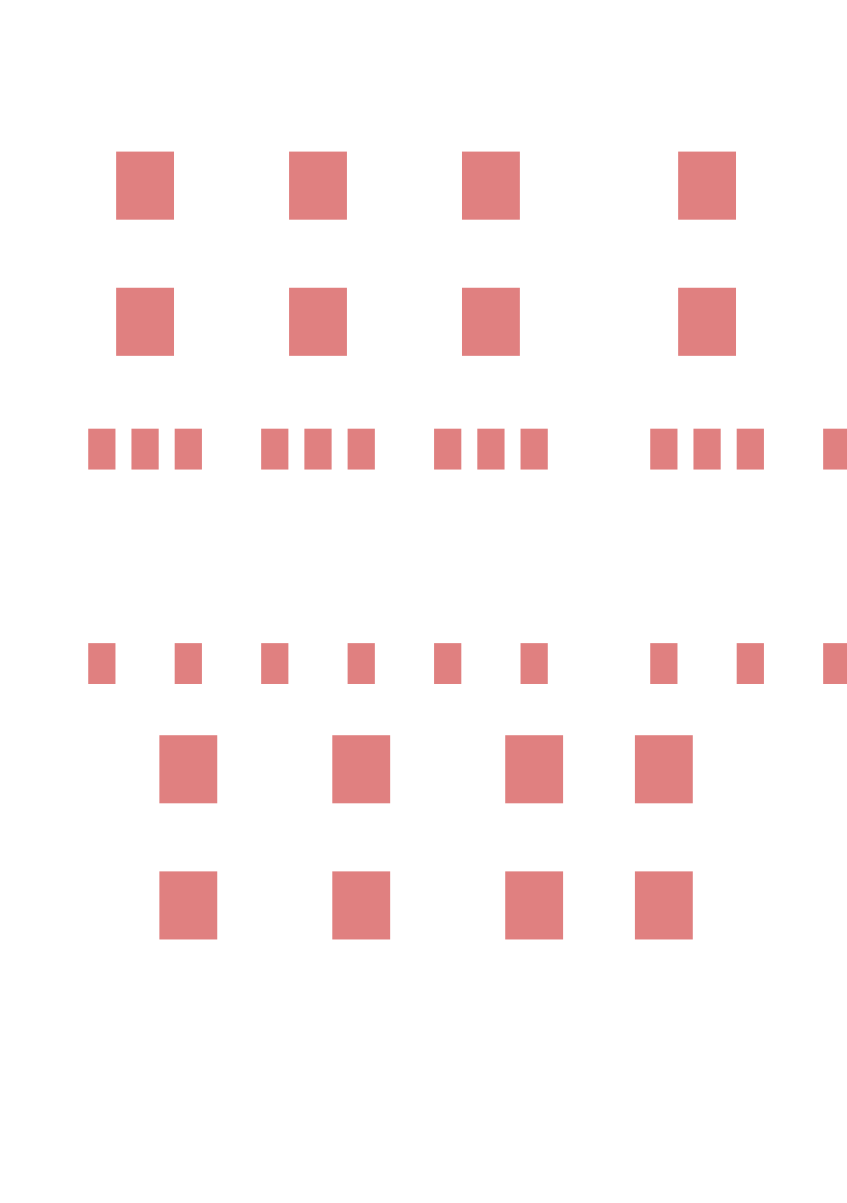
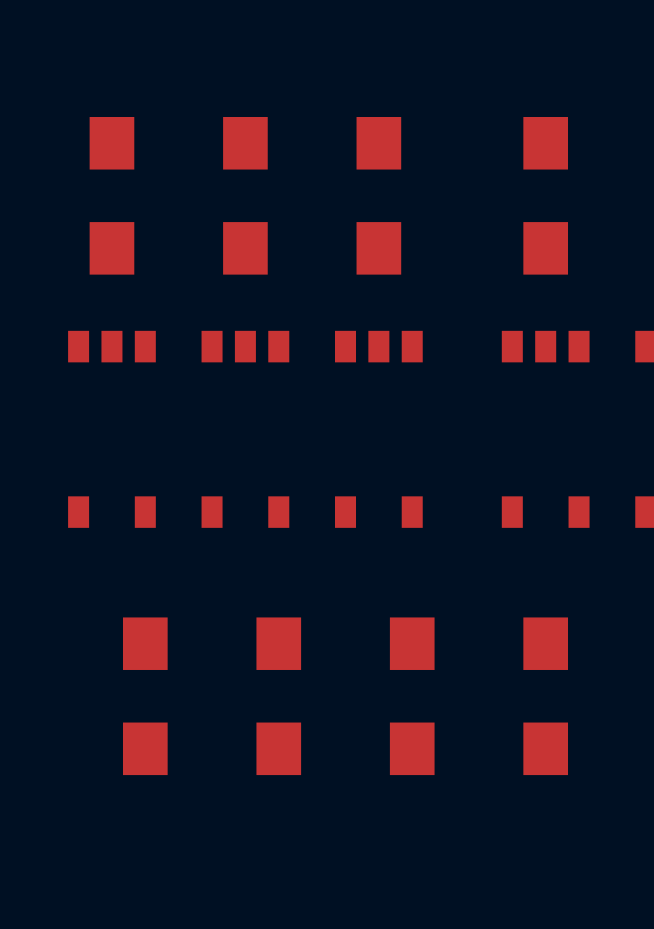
part position: (188, 837) -> (145, 696)
part position: (361, 837) -> (278, 696)
part position: (534, 837) -> (412, 696)
part: (663, 837) -> none
part: none -> (545, 696)

